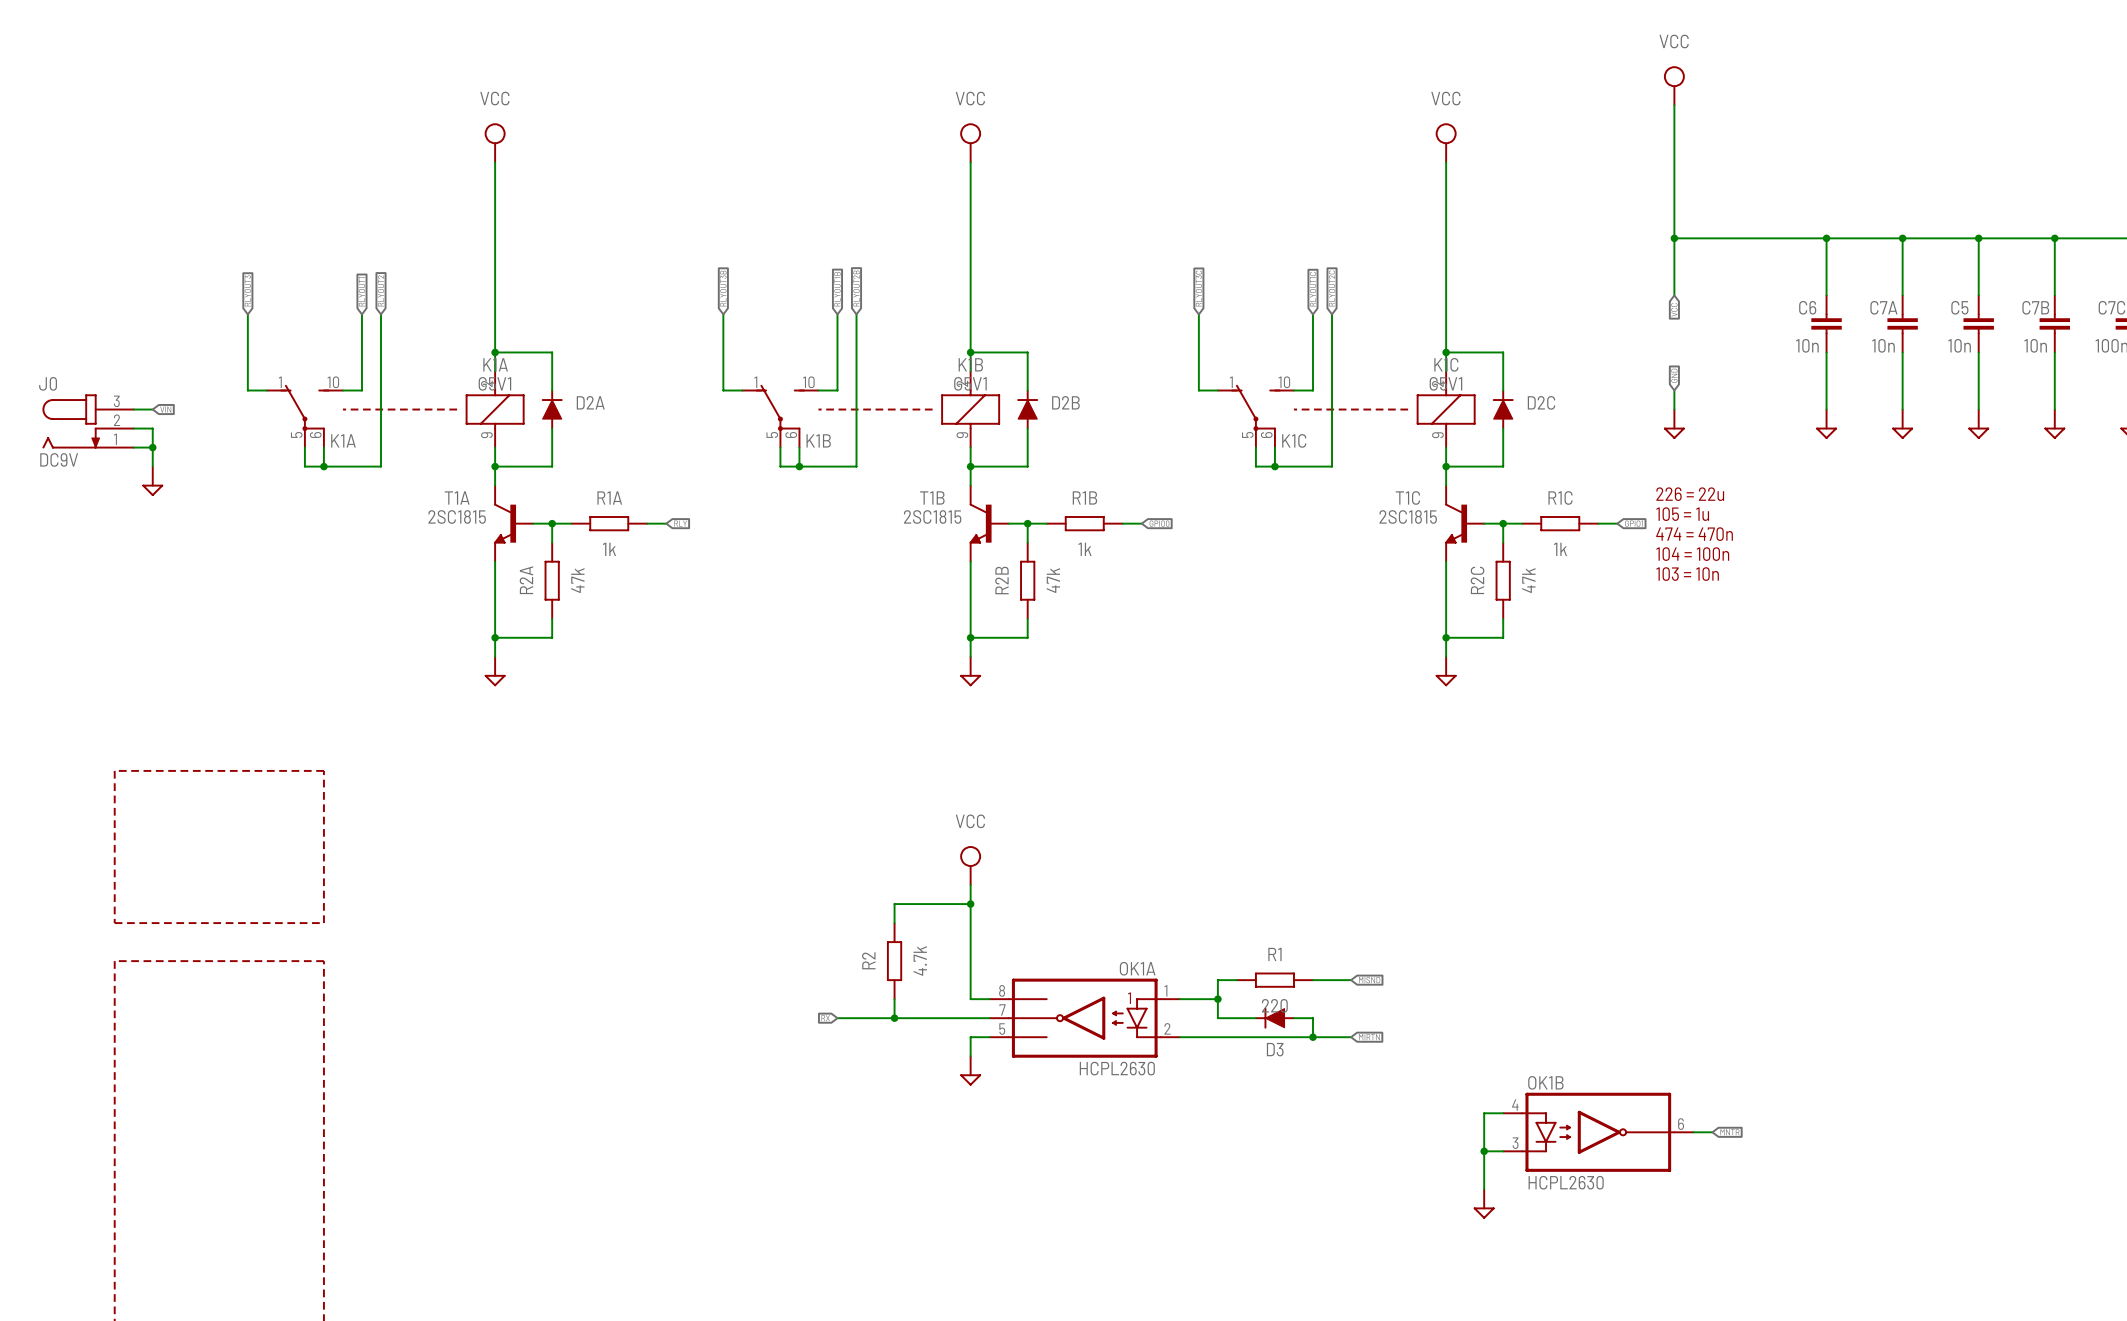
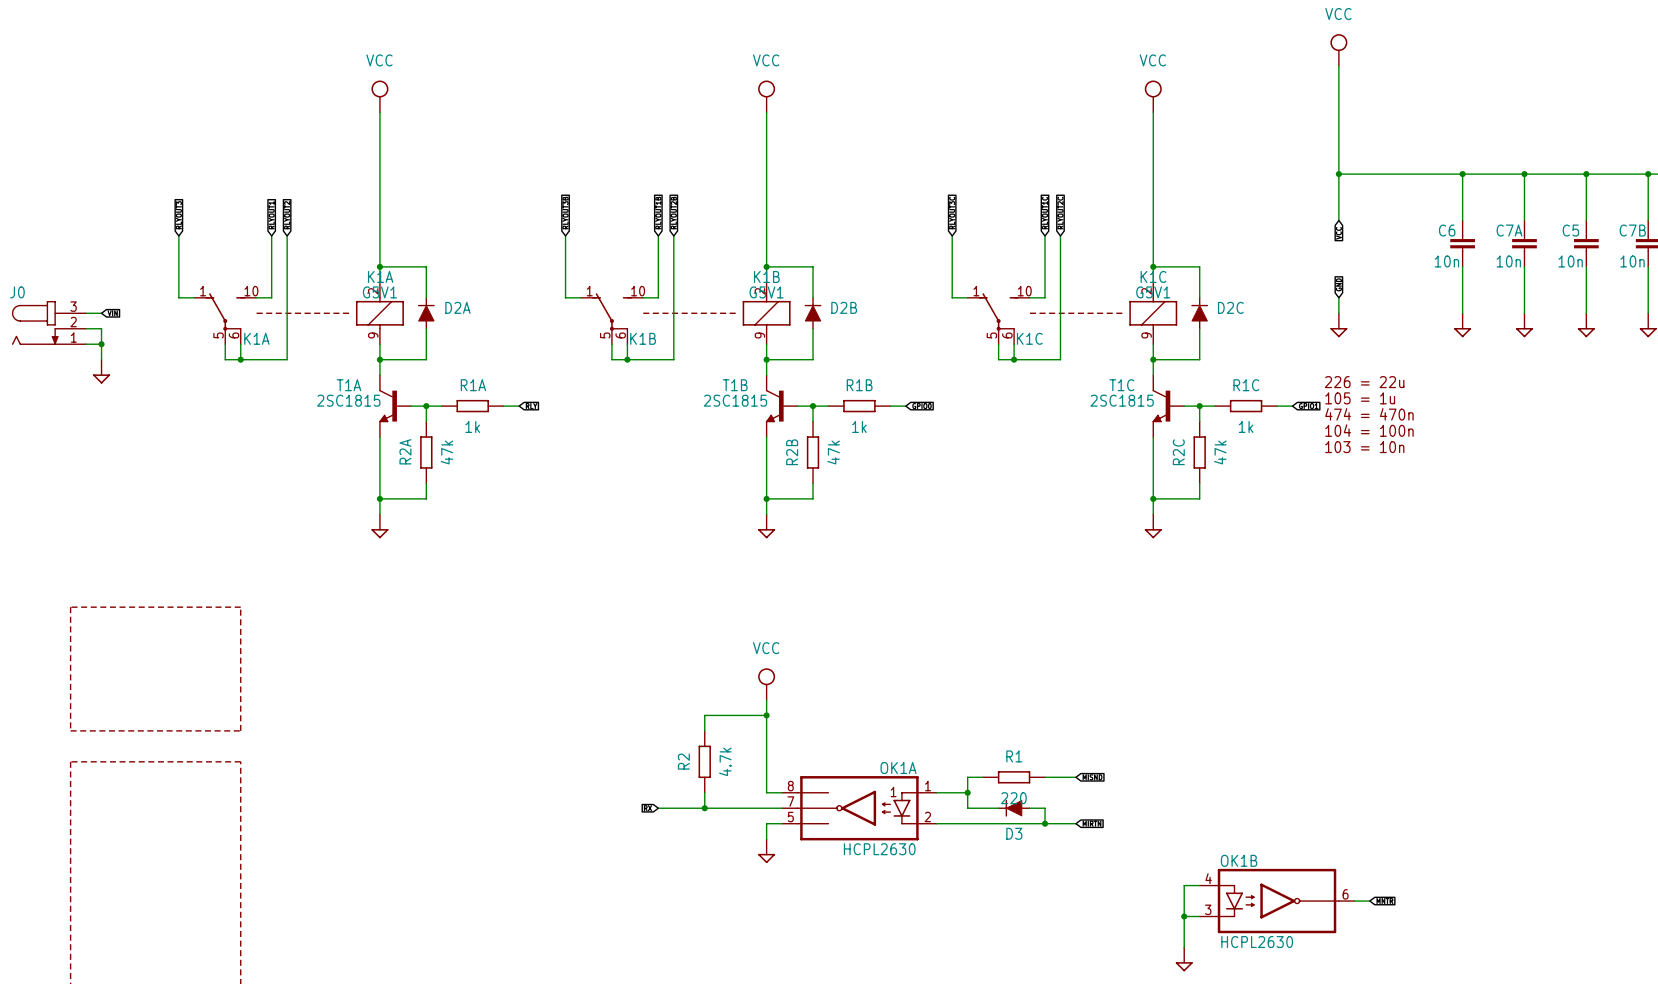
J0 value: DC9V (59, 459) -> none

